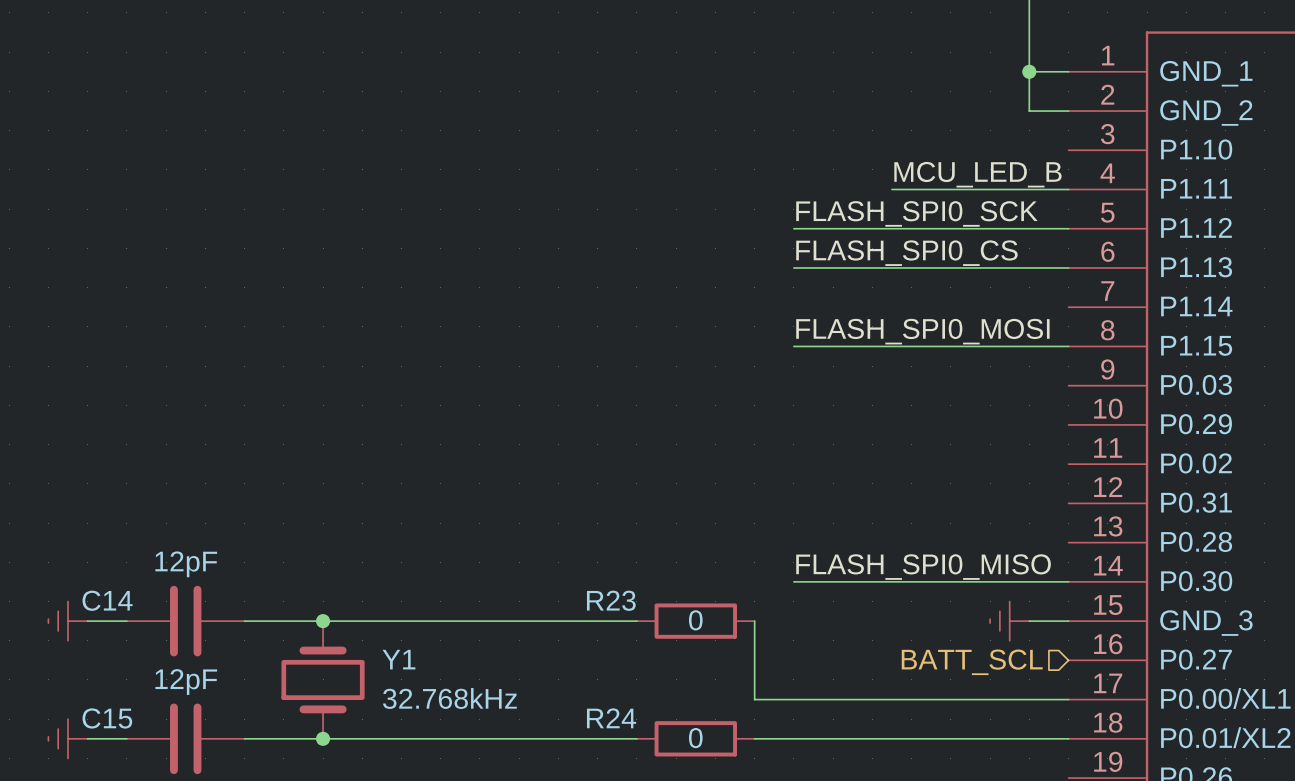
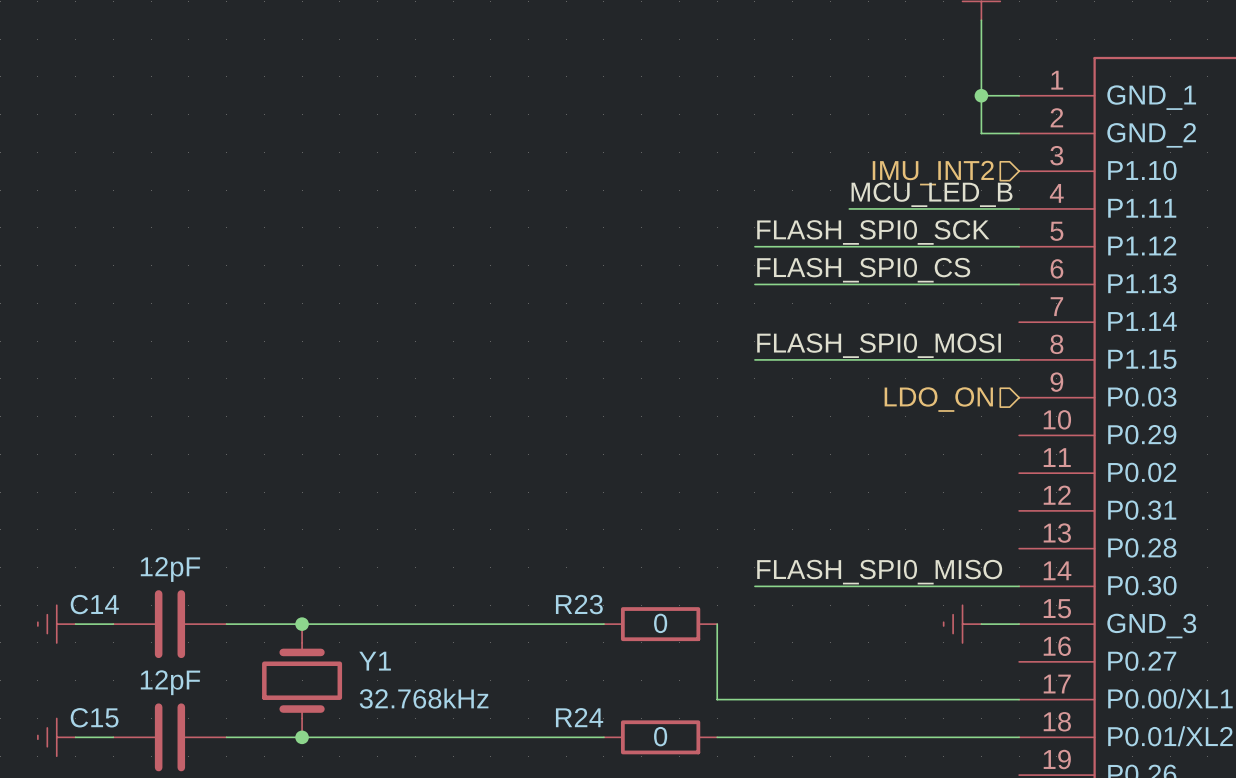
hierarchical label: none -> IMU_INT2 (933, 173)
hierarchical label: none -> LDO_ON (938, 399)
hierarchical label: BATT_SCL (972, 662) -> none

